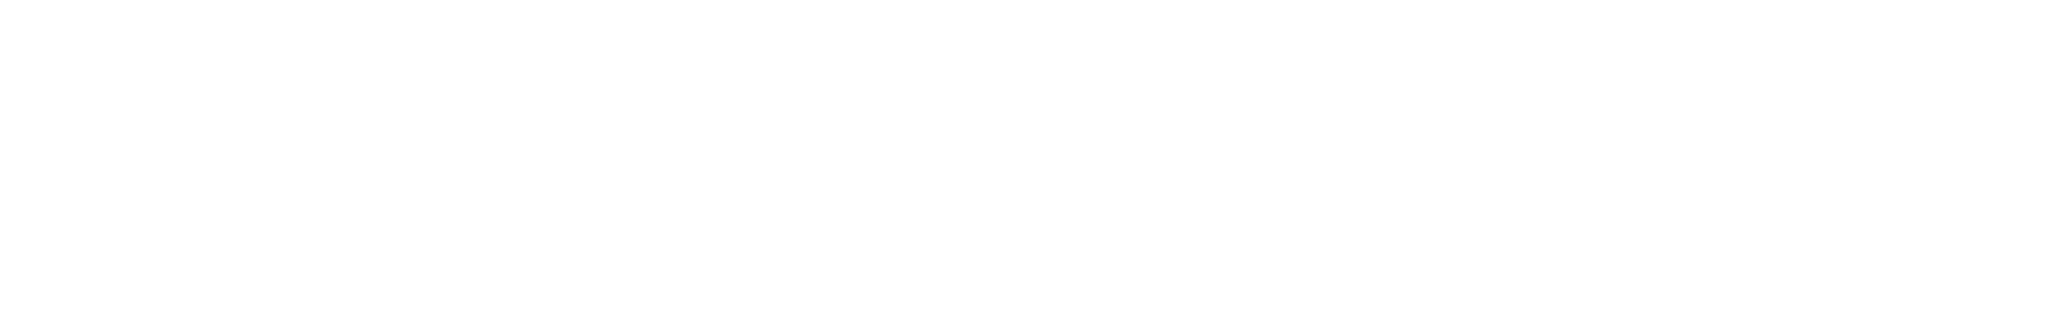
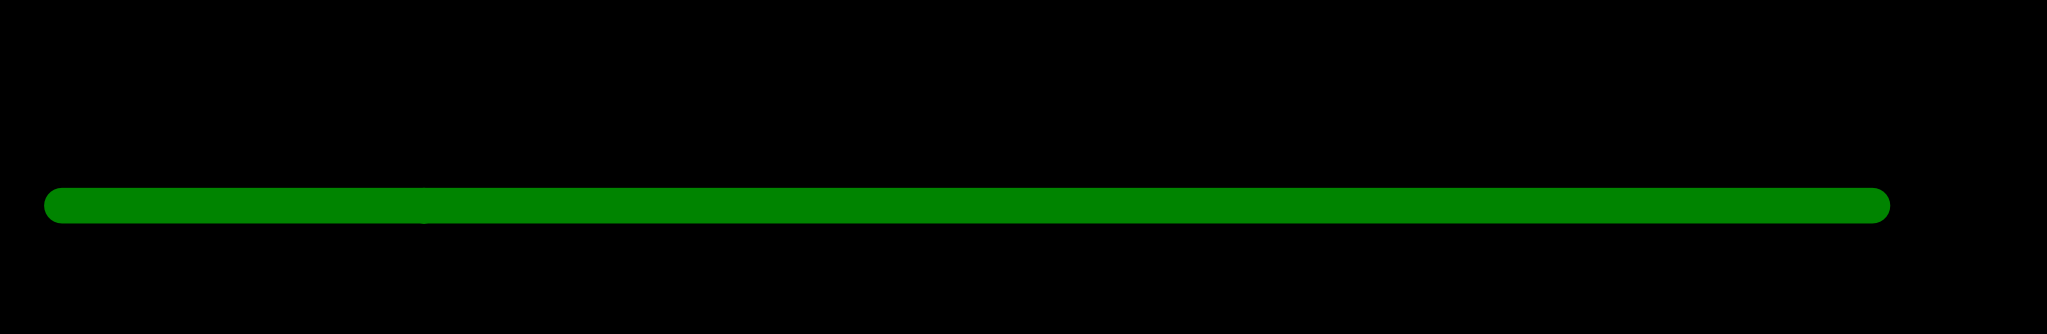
bottom track: none -> (61, 205) (1872, 205)

